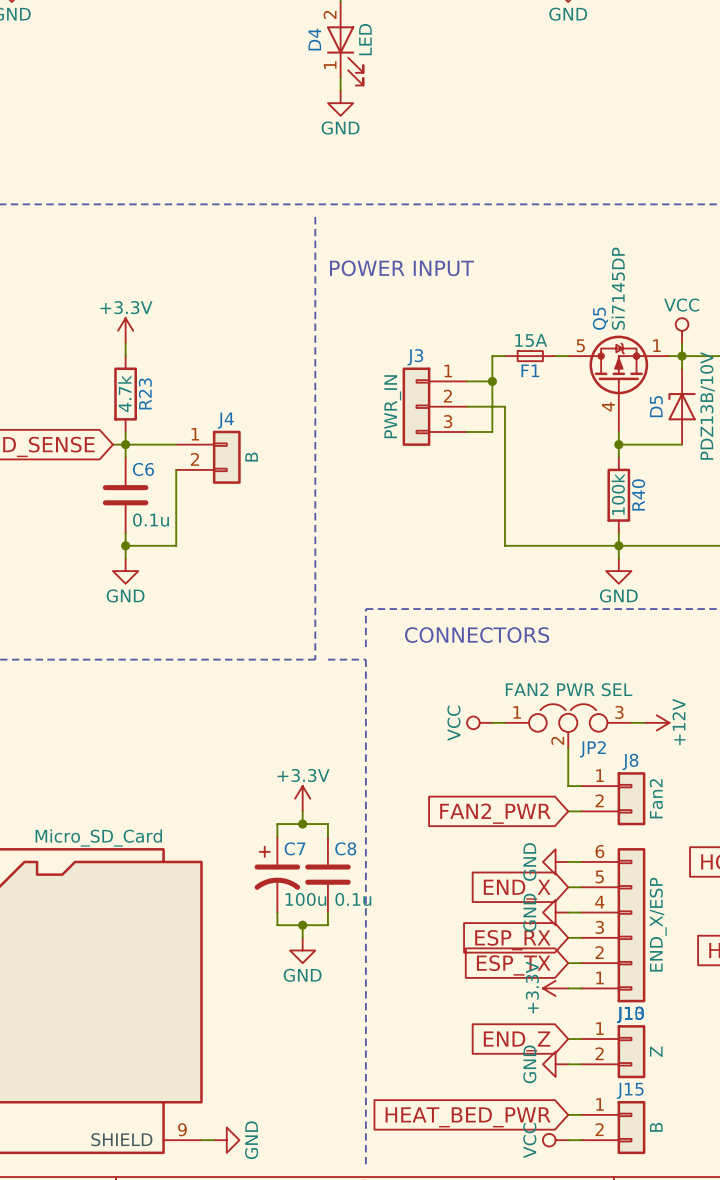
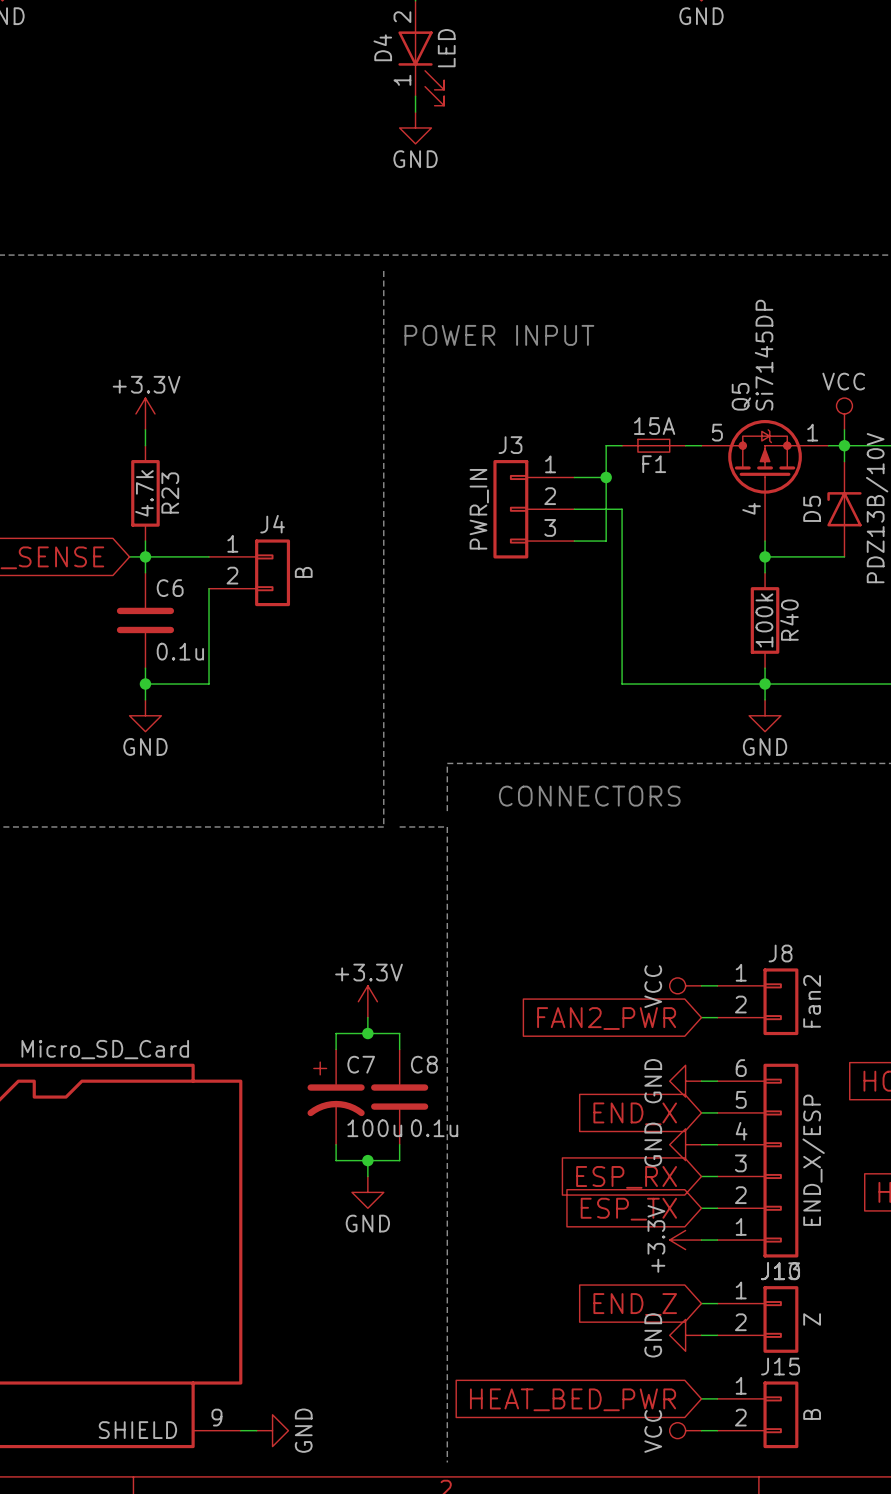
power symbol position: VCC (479, 722) -> VCC (685, 985)
wire: (492, 722) (505, 722) -> none
wire: (631, 722) (644, 722) -> none
power symbol: +12V (656, 722) -> none
JP2: FAN2 PWR SEL (568, 726) -> none
wire: (568, 748) (568, 786) -> none

